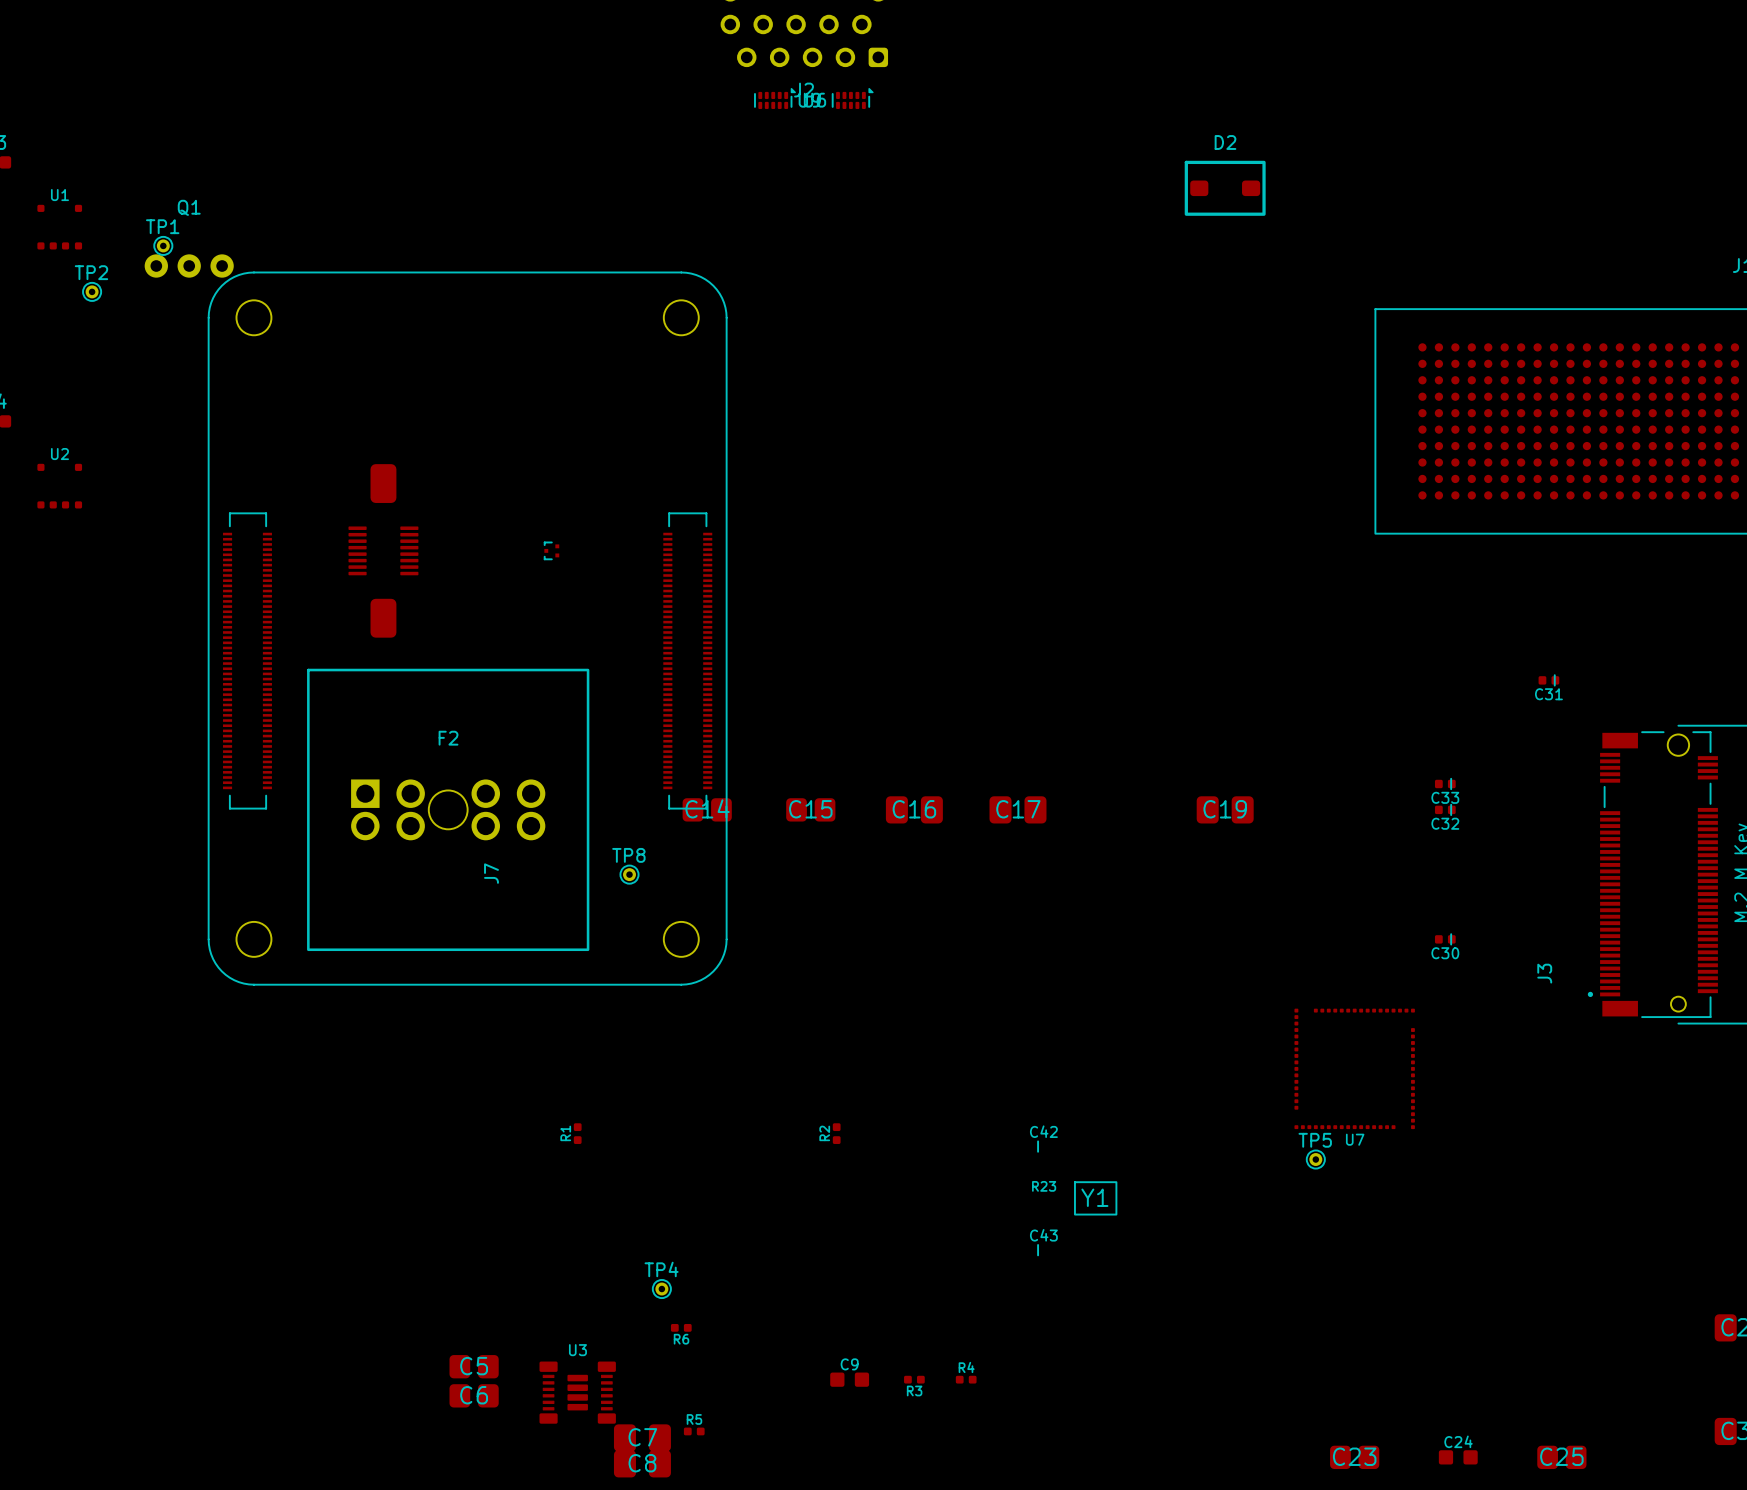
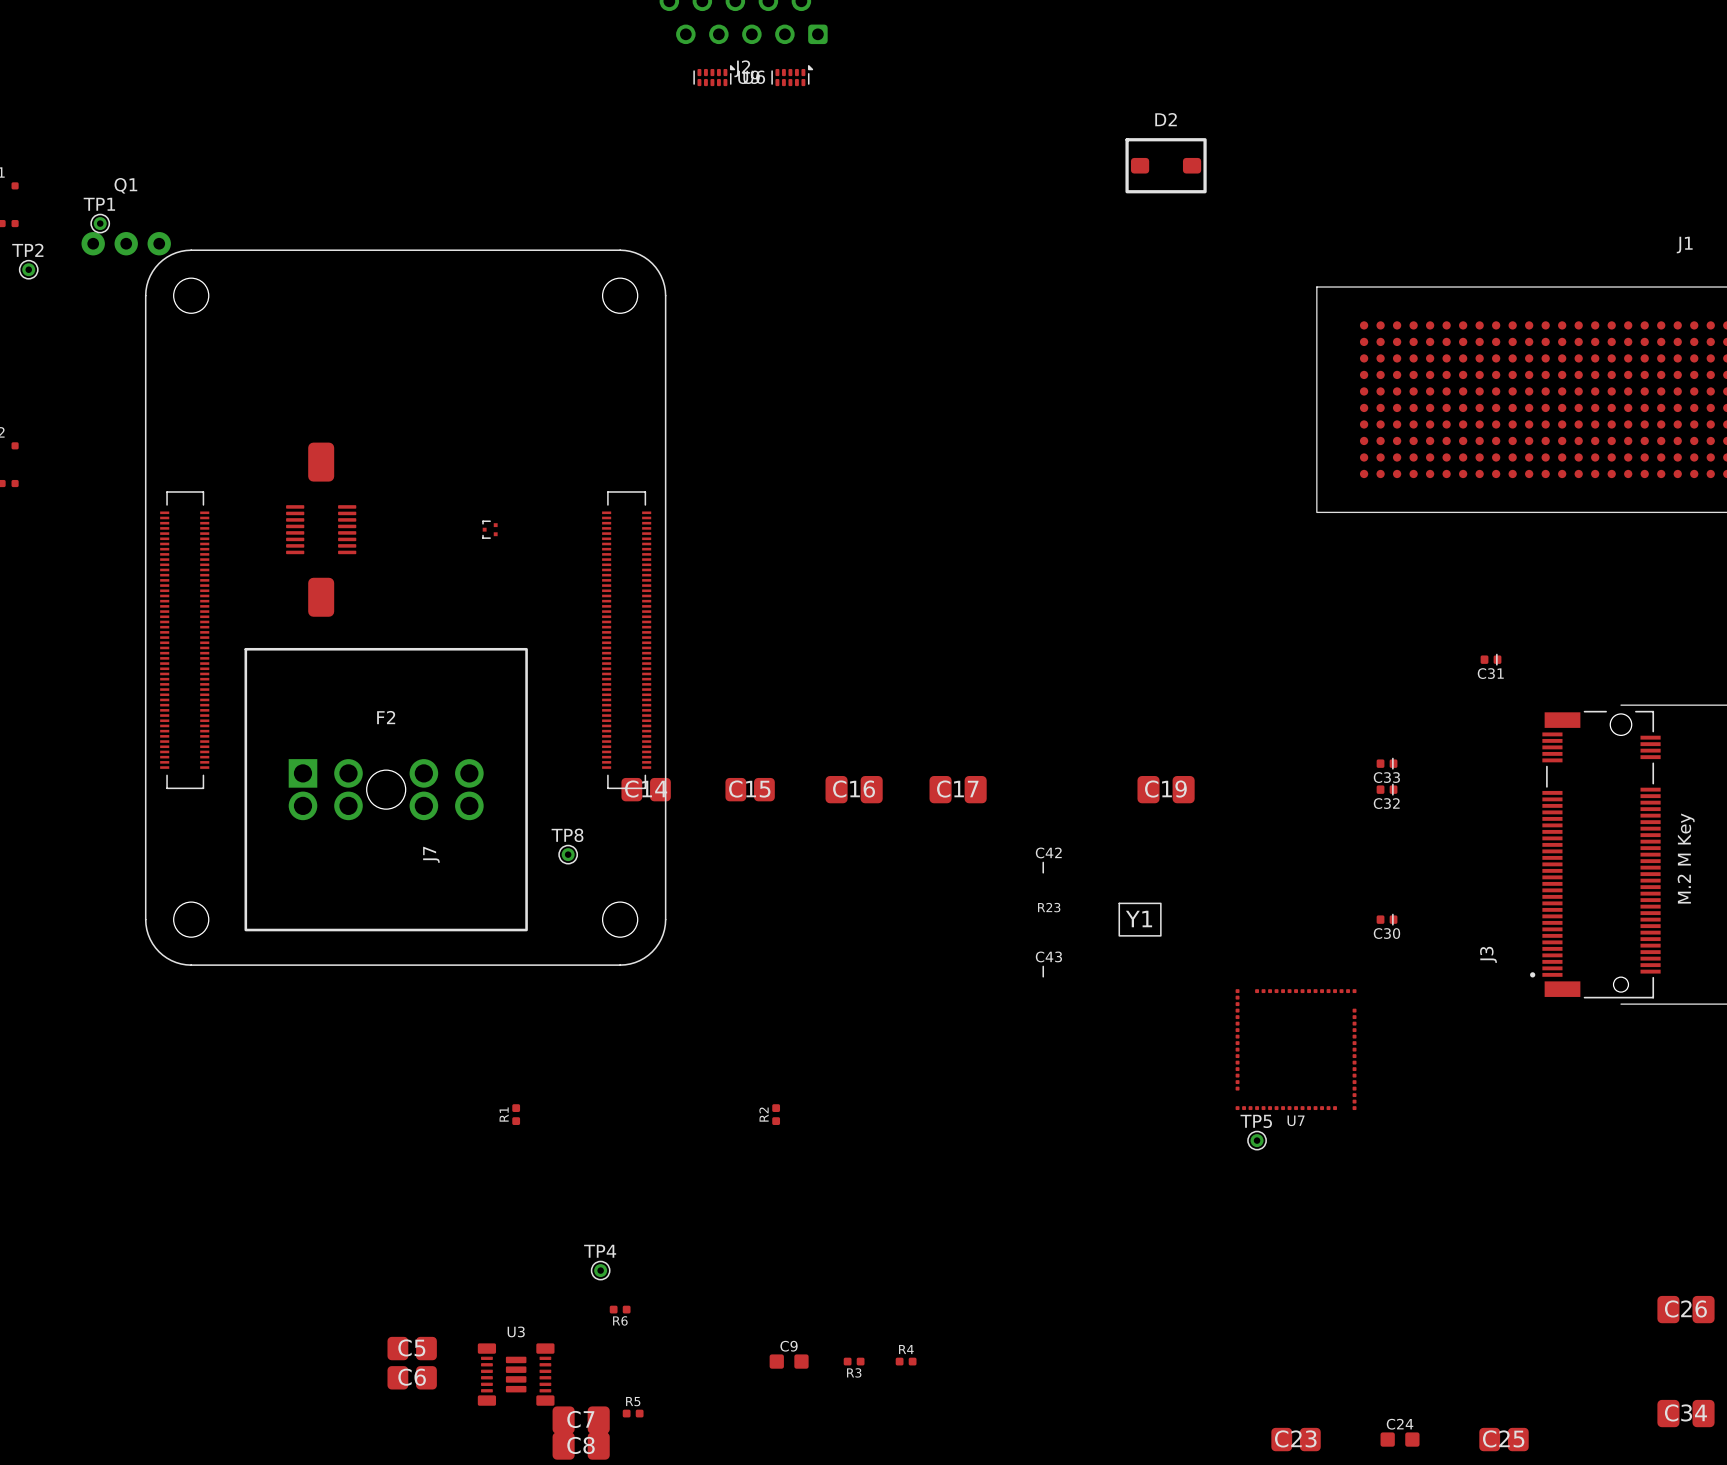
C42 position: (1038, 1146) -> (1043, 867)
R23 position: (1044, 1186) -> (1049, 907)
Y1 position: (1095, 1198) -> (1140, 919)
C43 position: (1038, 1250) -> (1043, 971)

